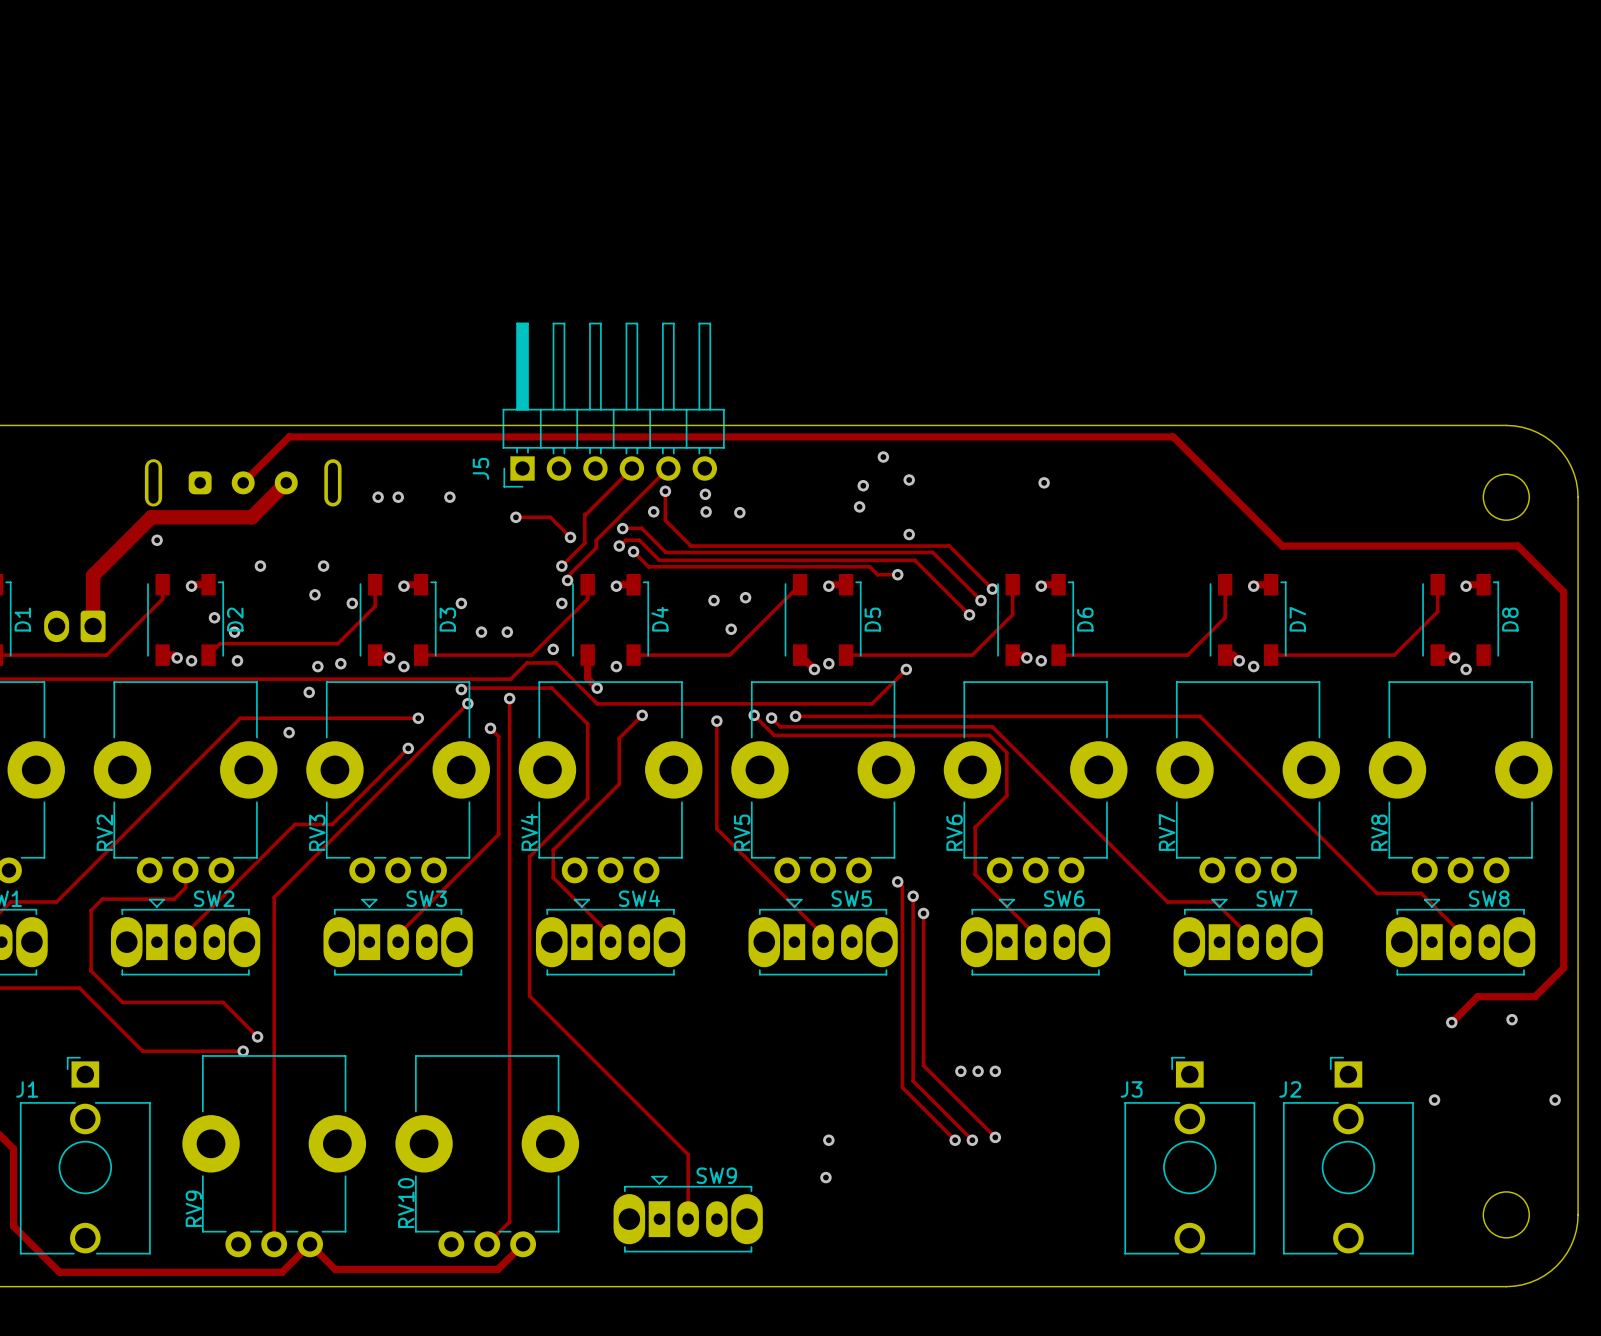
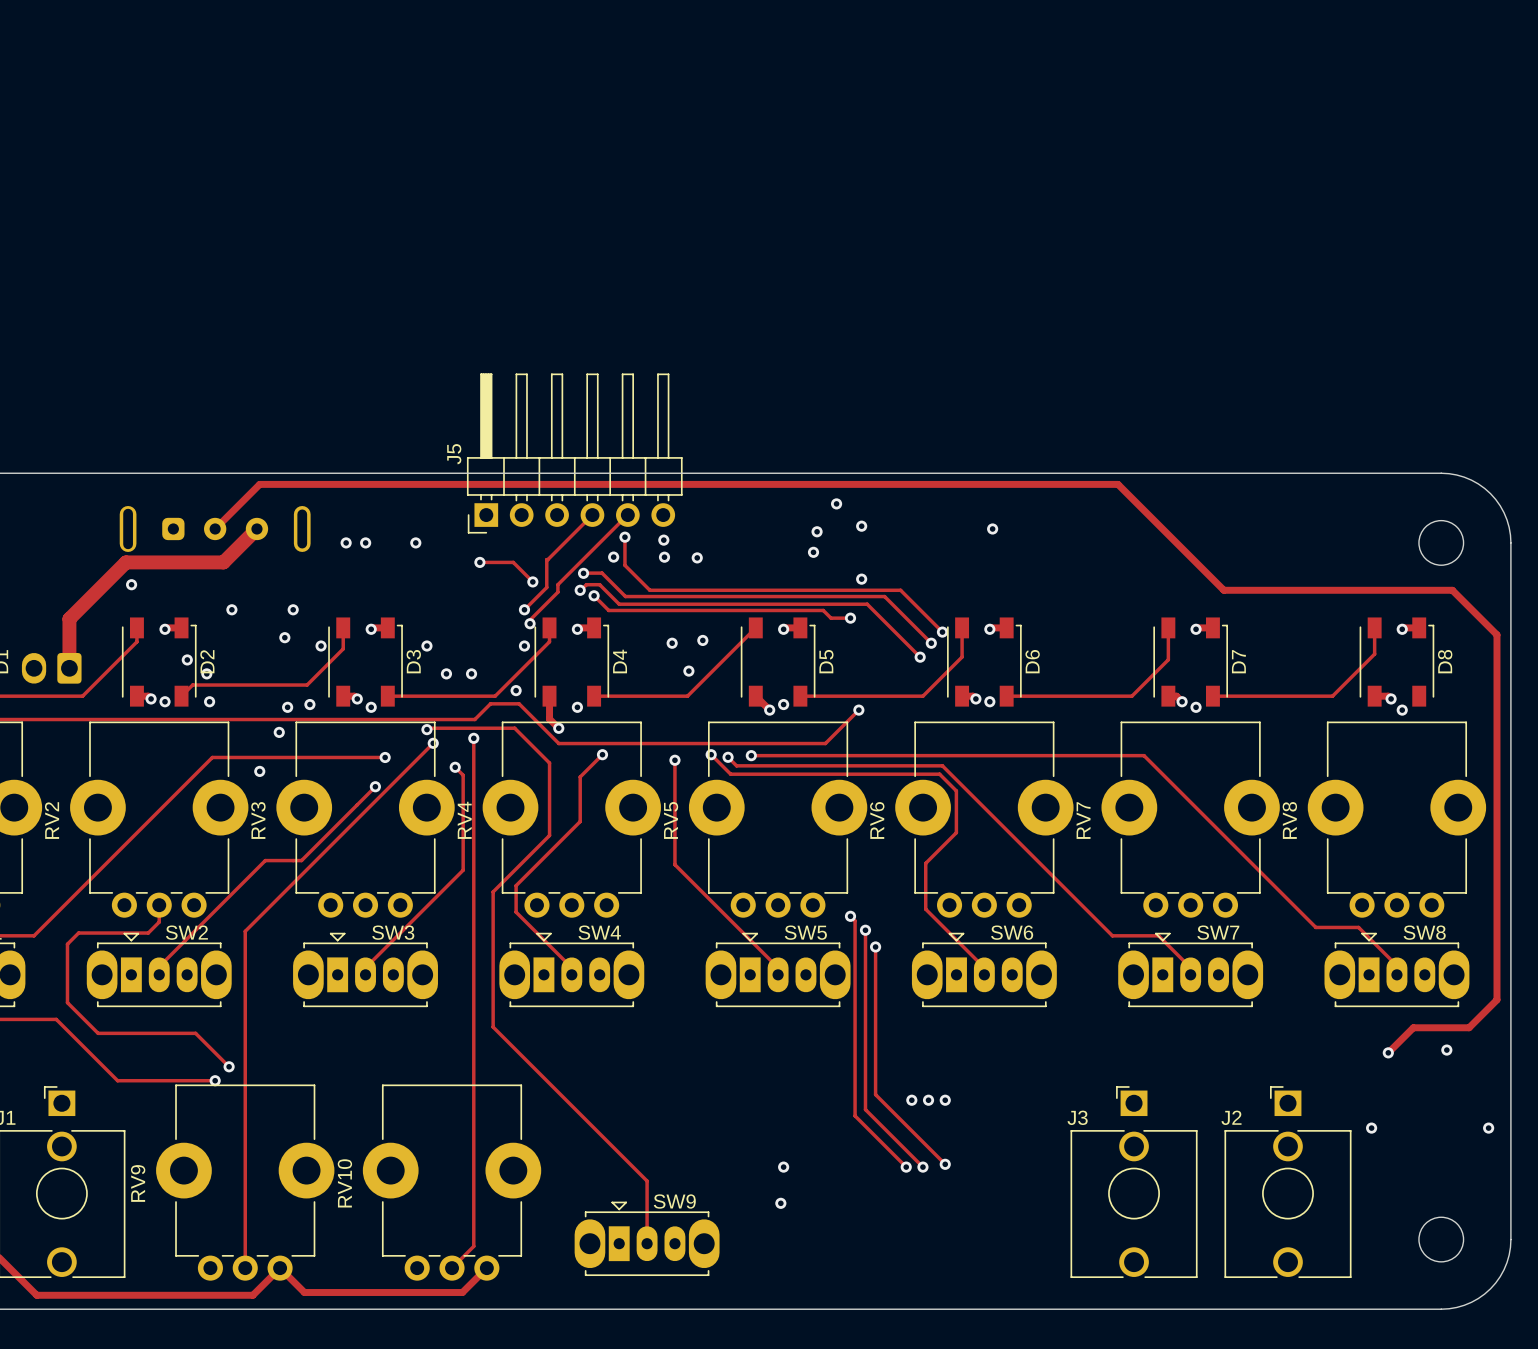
J5 name position: J5 (480, 468) -> J5 (454, 454)
RV2 name position: RV2 (104, 832) -> RV2 (52, 820)
RV3 name position: RV3 (317, 832) -> RV3 (258, 820)
RV4 name position: RV4 (529, 832) -> RV4 (464, 820)
RV5 name position: RV5 (742, 832) -> RV5 (671, 820)
RV6 name position: RV6 (954, 832) -> RV6 (877, 820)
RV7 name position: RV7 (1167, 832) -> RV7 (1083, 820)
RV8 name position: RV8 (1379, 832) -> RV8 (1289, 820)
RV10 name position: RV10 (406, 1203) -> RV10 (344, 1183)
RV9 name position: RV9 (193, 1208) -> RV9 (138, 1183)

